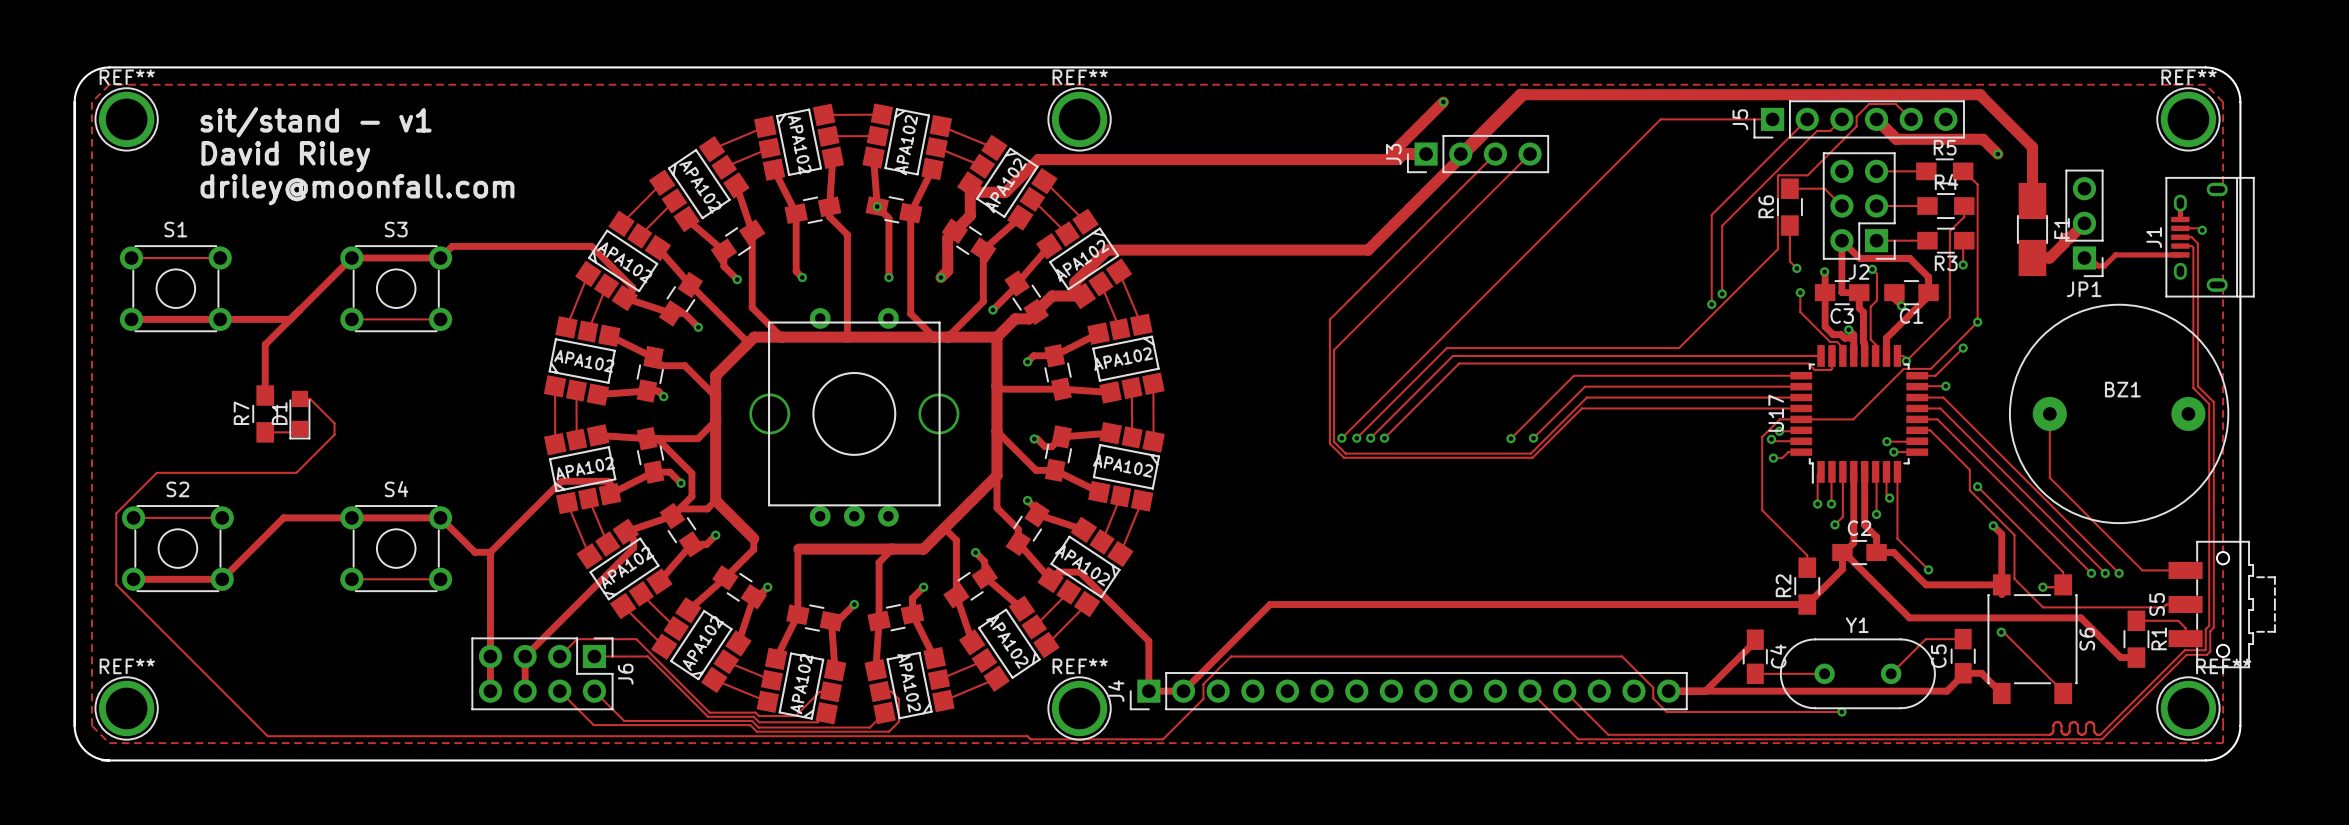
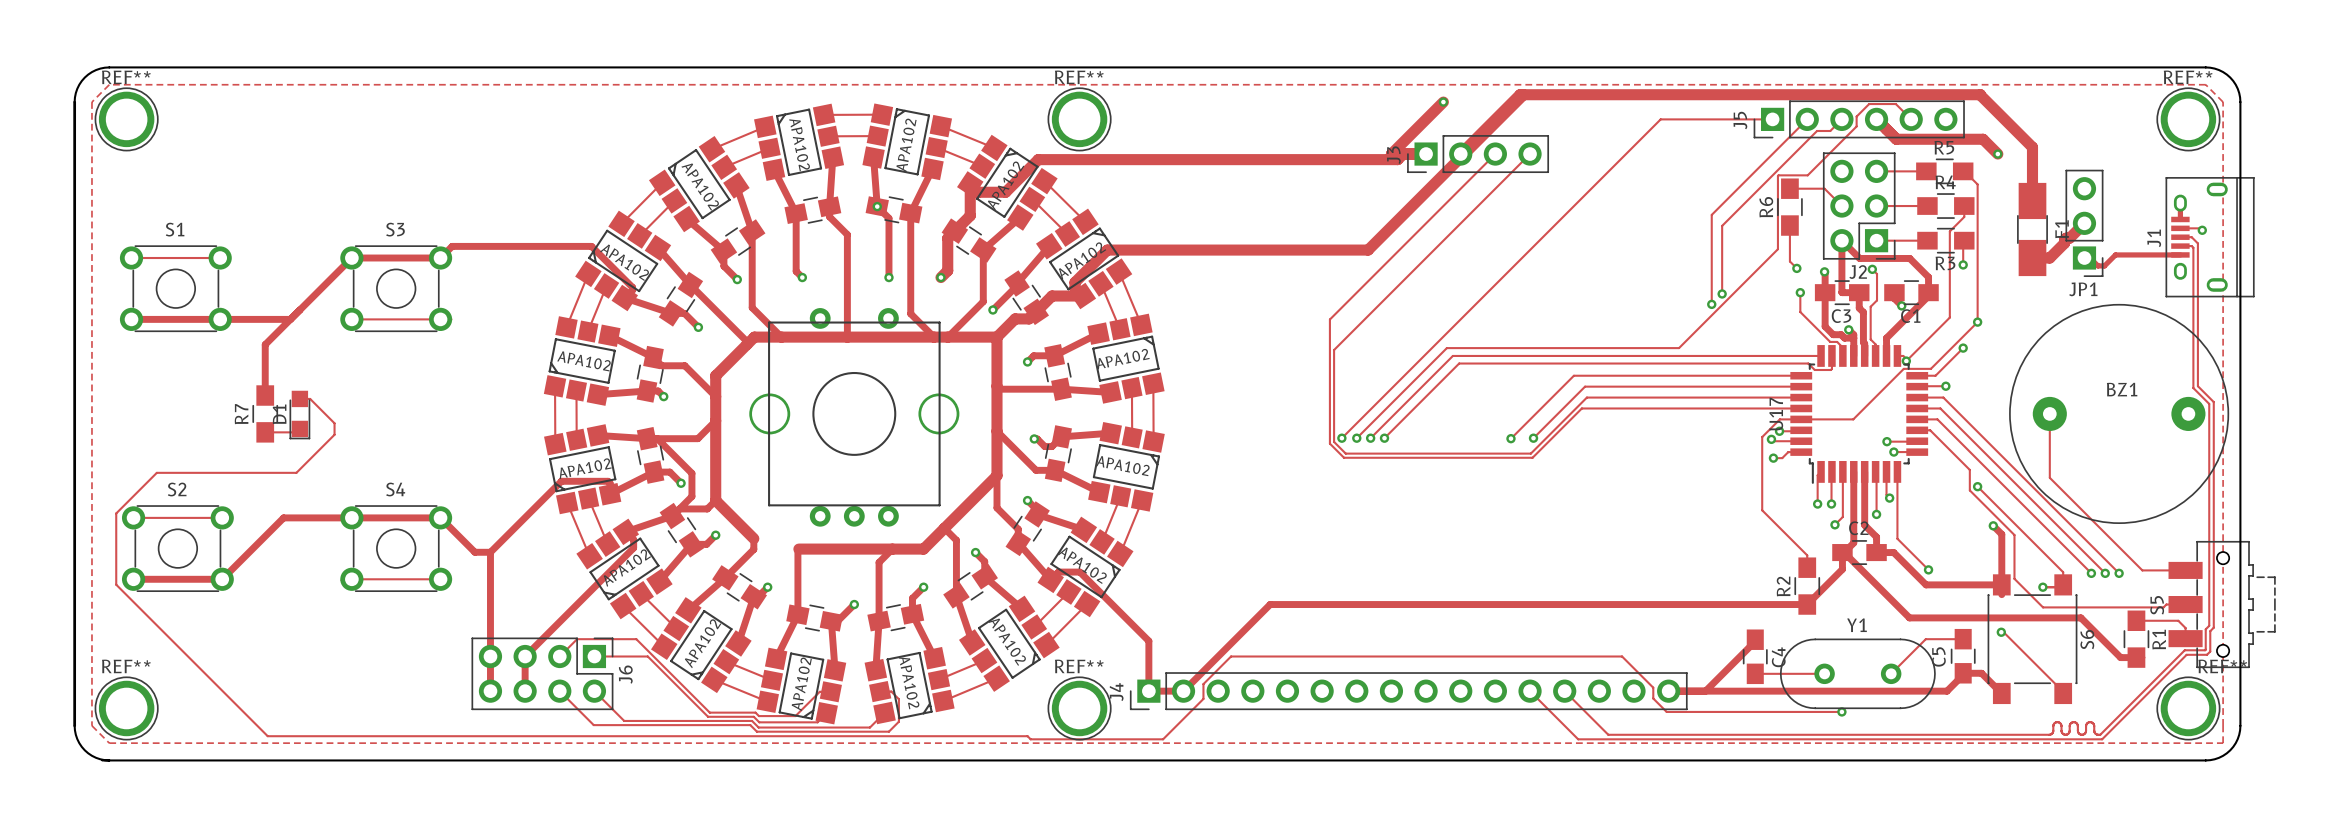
text: sit/stand - v1 (316, 122) -> none
text: David Riley (285, 156) -> none
text: driley@moonfall.com (357, 189) -> none

